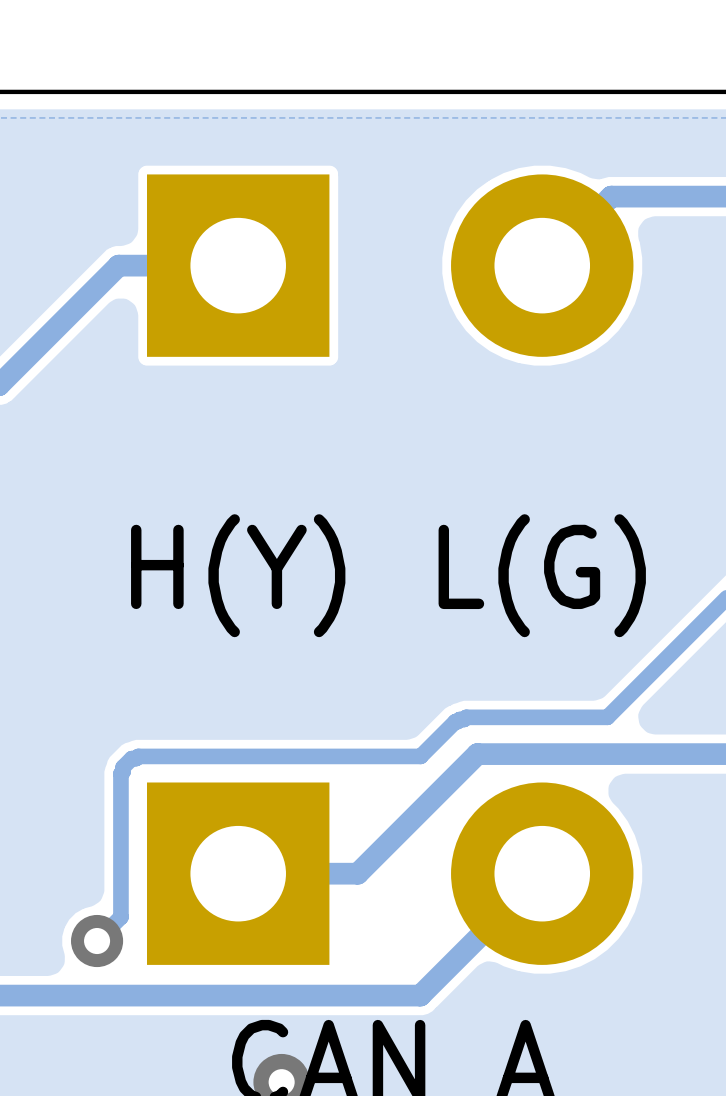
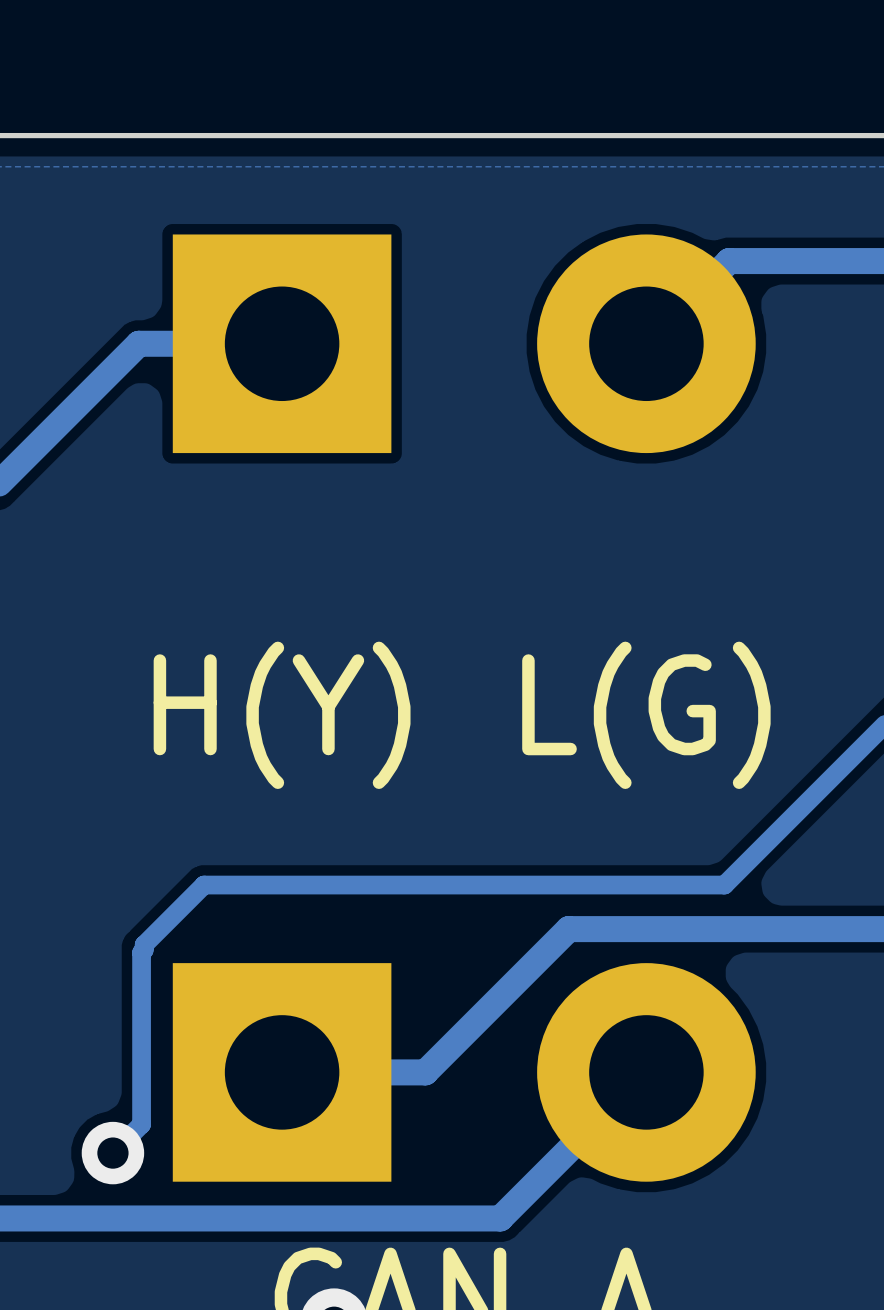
track: (466, 717) (455, 721) (420, 756) (138, 756) (131, 758) -> (555, 885) (204, 885) (154, 934)

